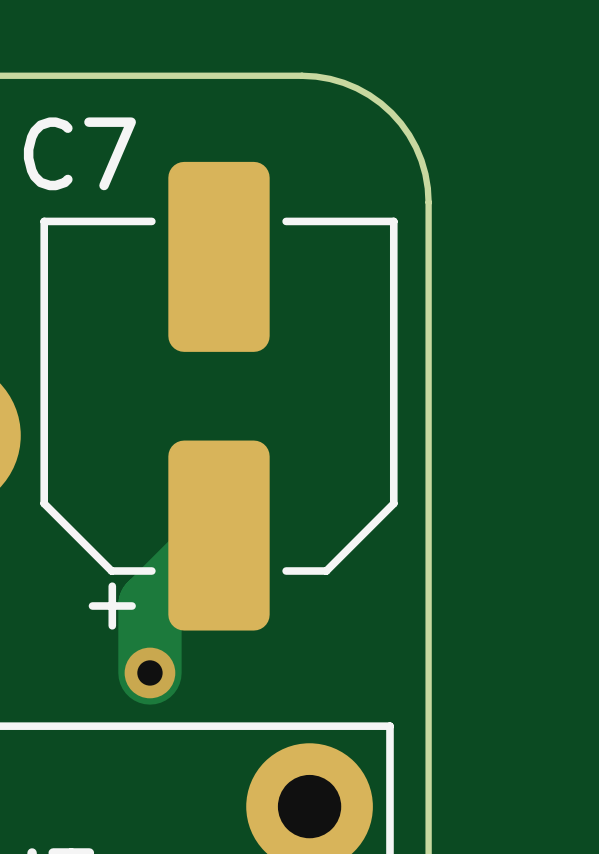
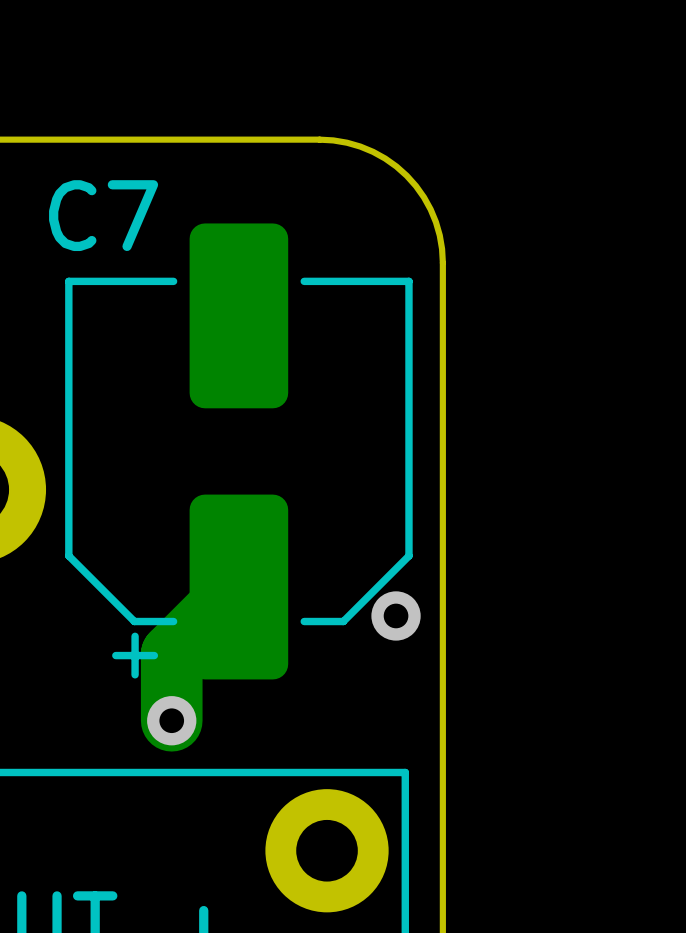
via: none -> (396, 615)

